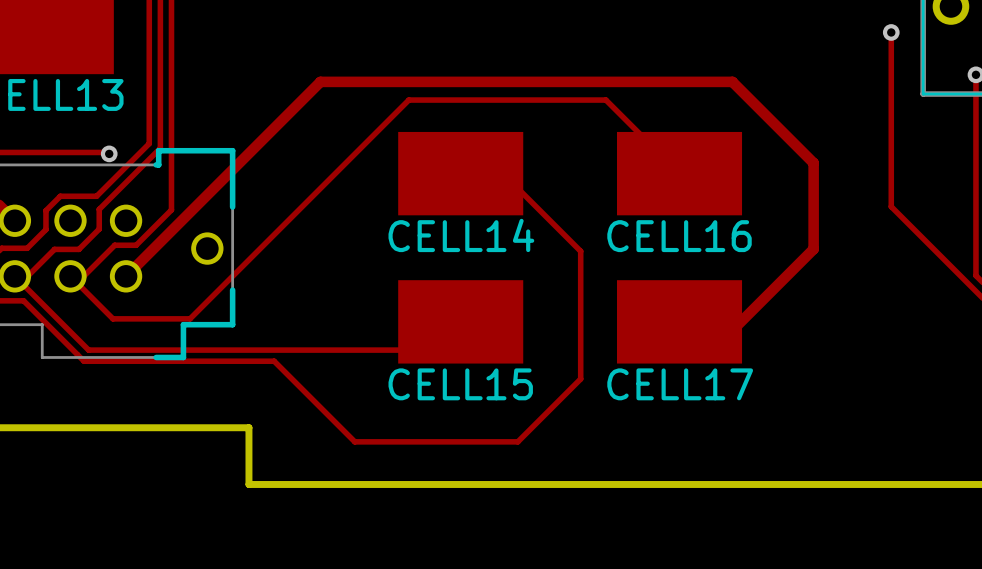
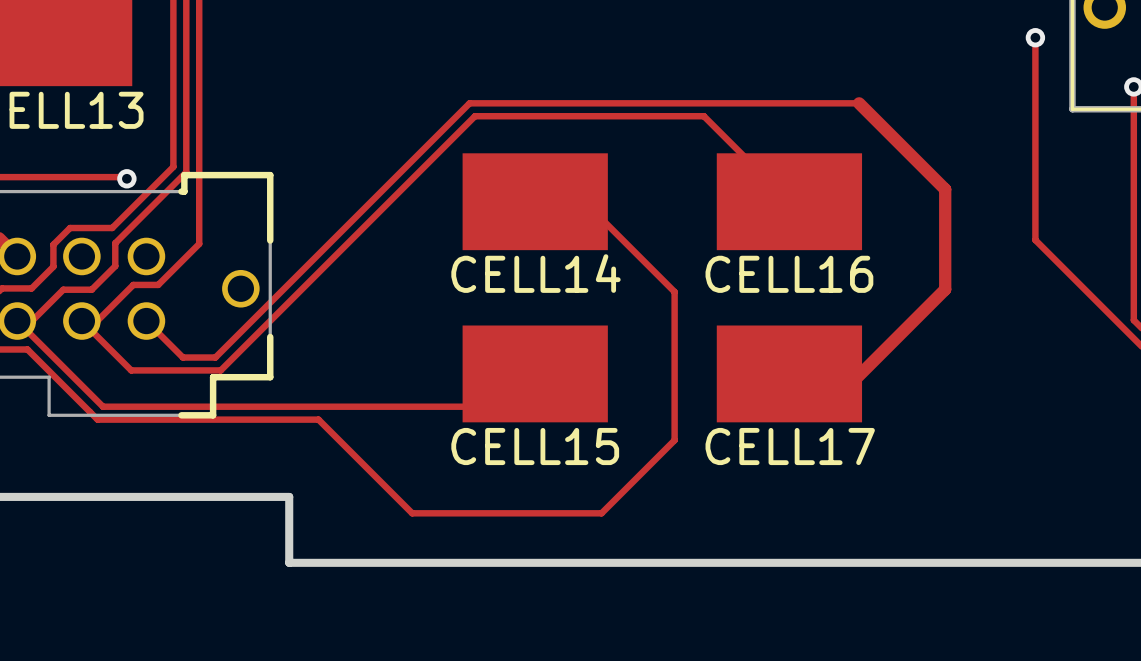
track: (739, 88) (732, 81) (320, 81) (126, 276) -> (859, 103) (469, 103) (215, 357) (182, 357) (146, 321)

